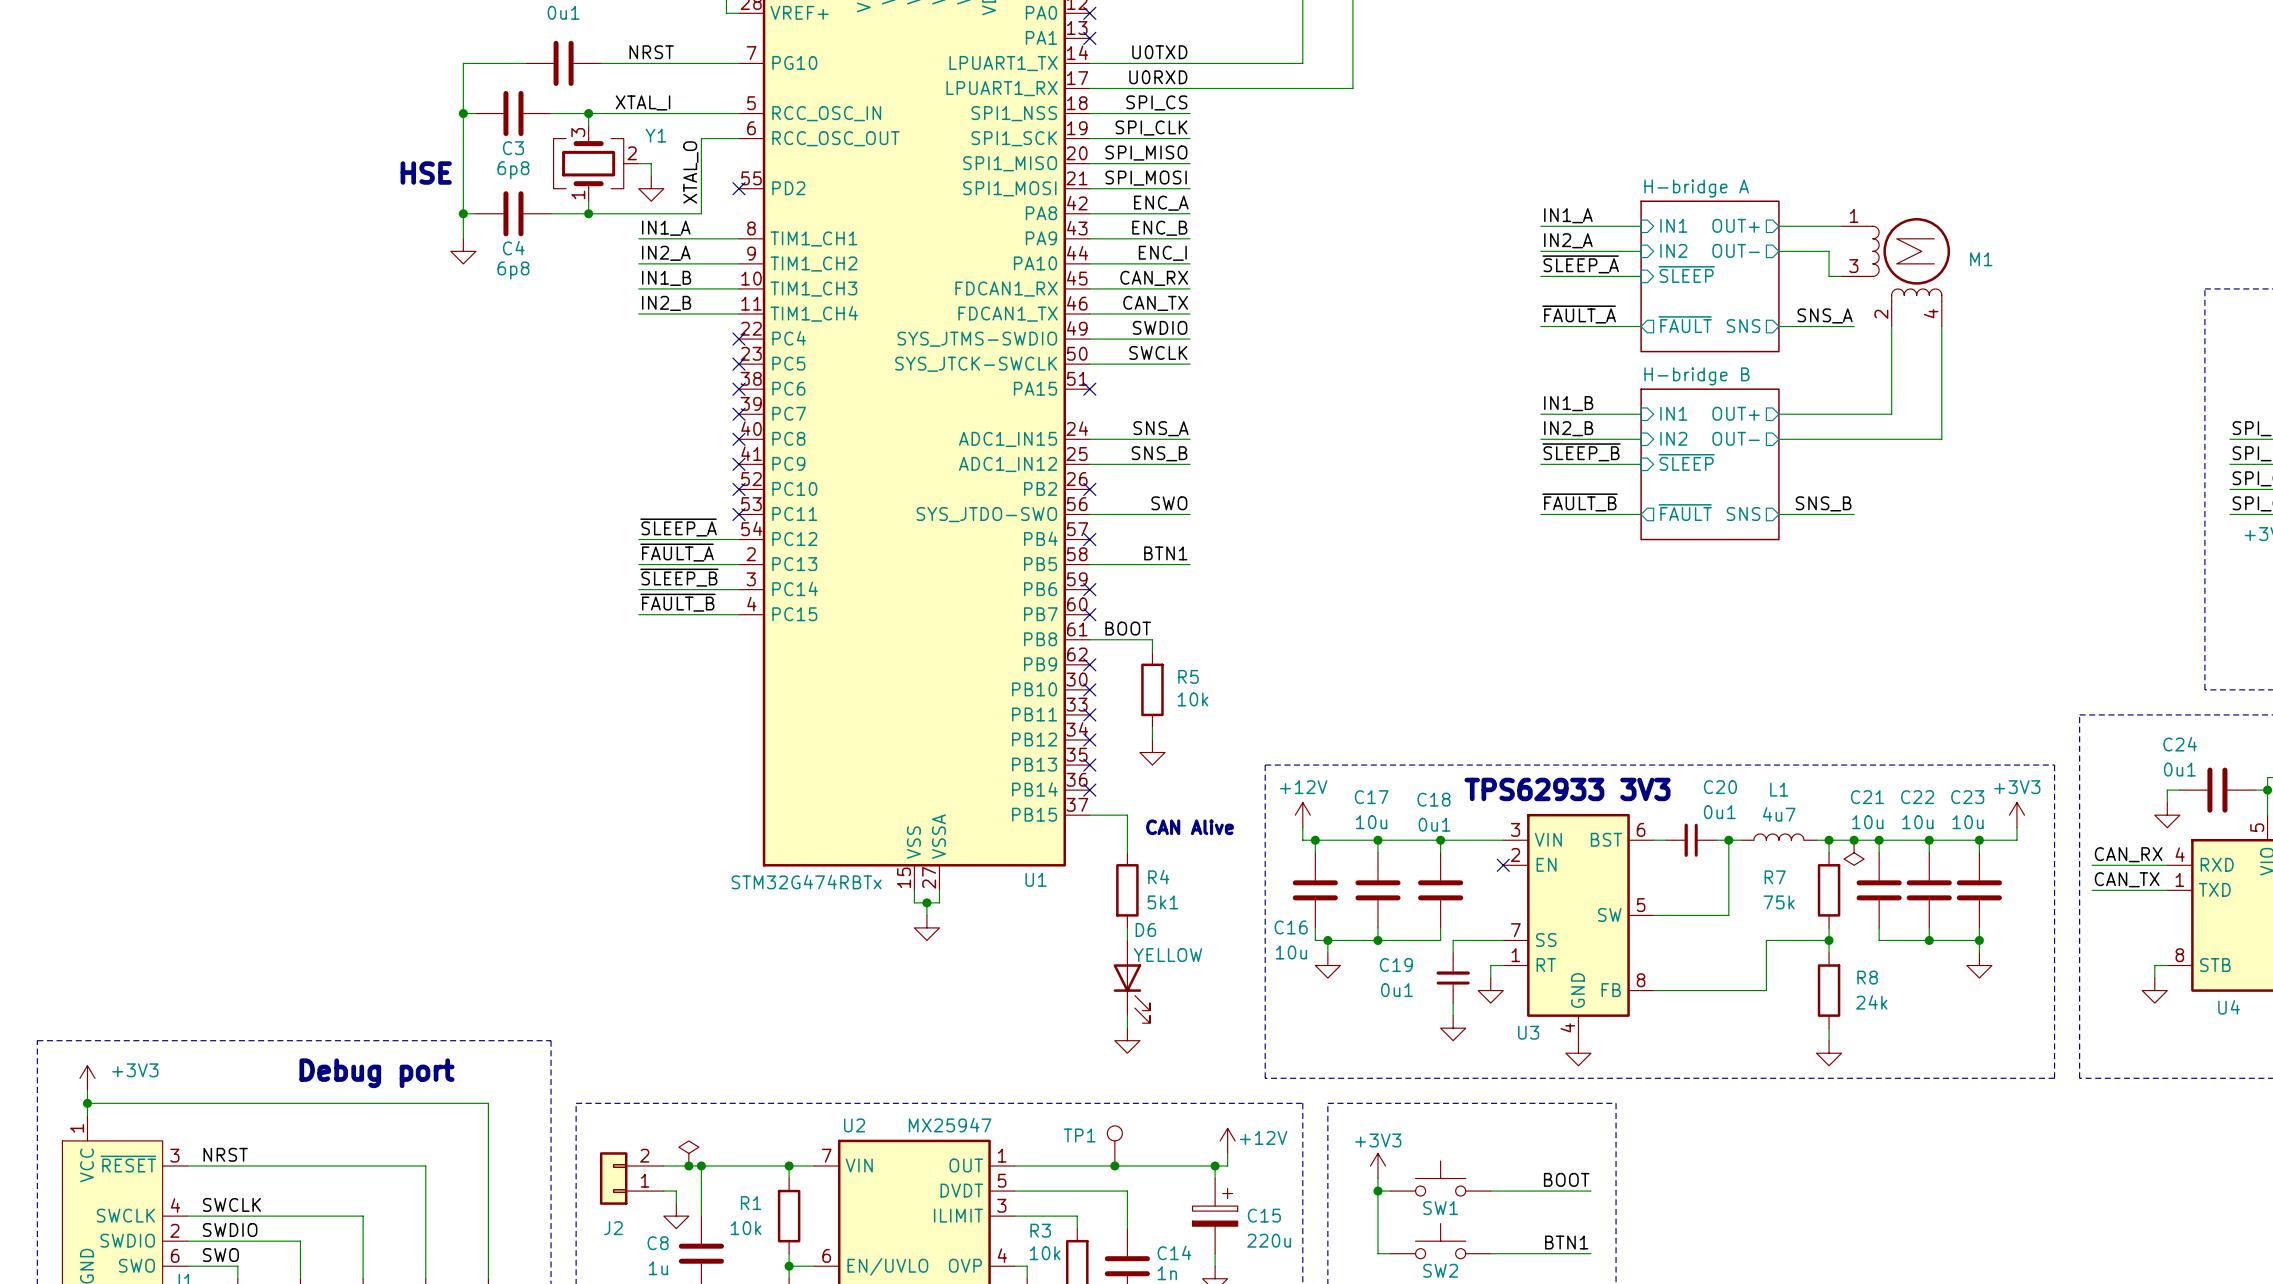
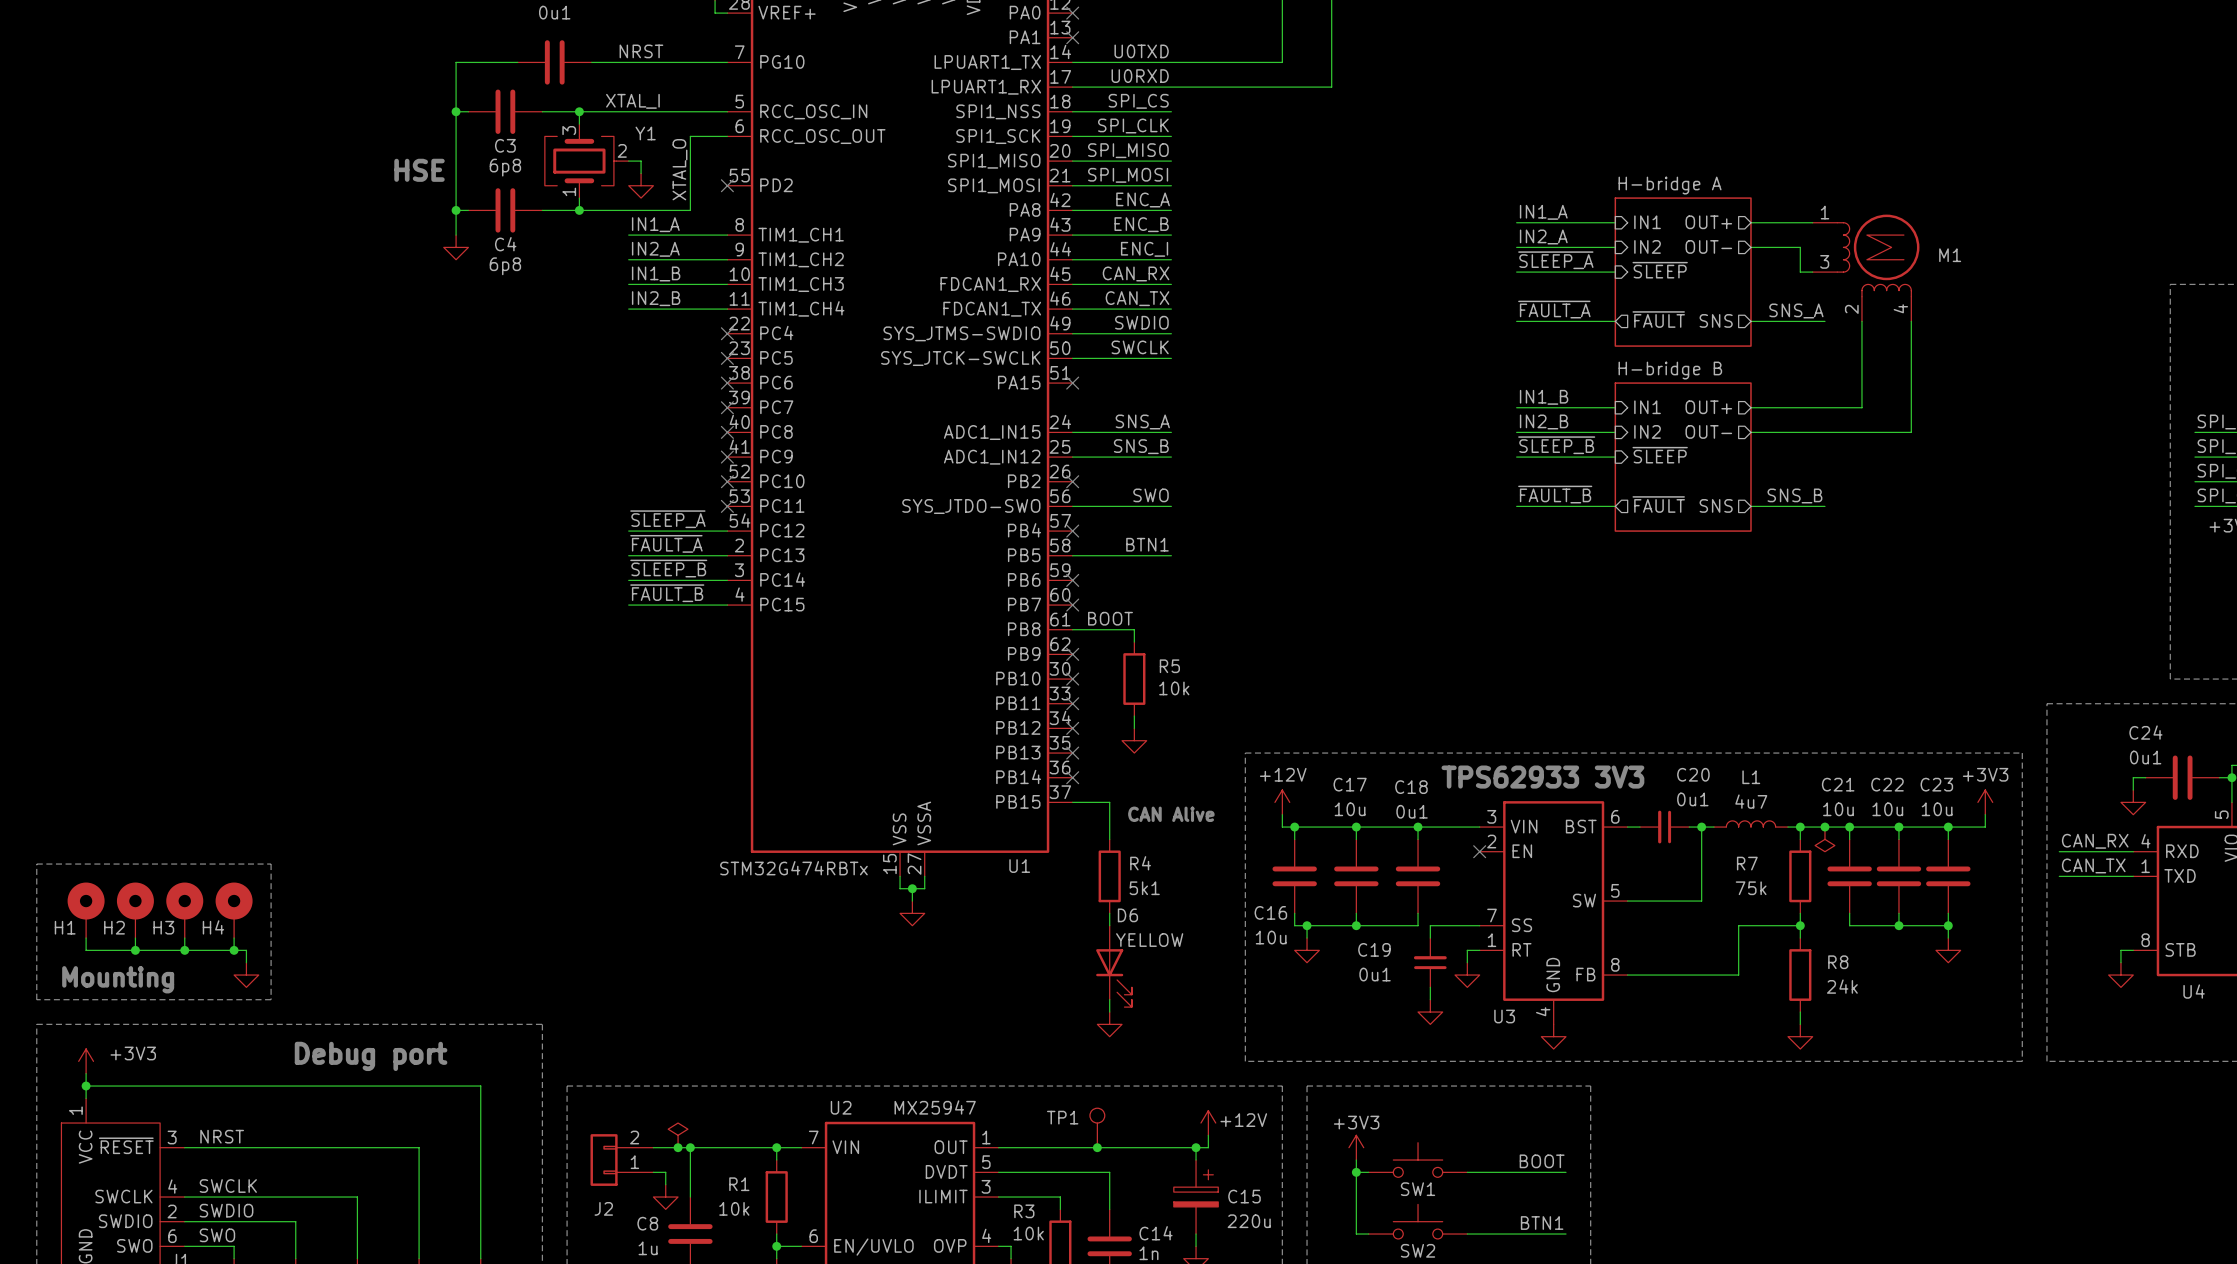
line: none -> (36, 864) (271, 864) (271, 999) (36, 999) (36, 864)
H1: none -> (86, 910)
H2: none -> (135, 910)
H3: none -> (184, 910)
H4: none -> (234, 910)
wire: none -> (86, 938) (86, 950) (246, 950) (246, 962)
wire: none -> (135, 938) (135, 950)
wire: none -> (184, 938) (184, 950)
wire: none -> (234, 938) (234, 950)
junction: none -> (135, 950)
junction: none -> (184, 950)
junction: none -> (234, 950)
power symbol: none -> (246, 975)
text: none -> Mounting (118, 979)

